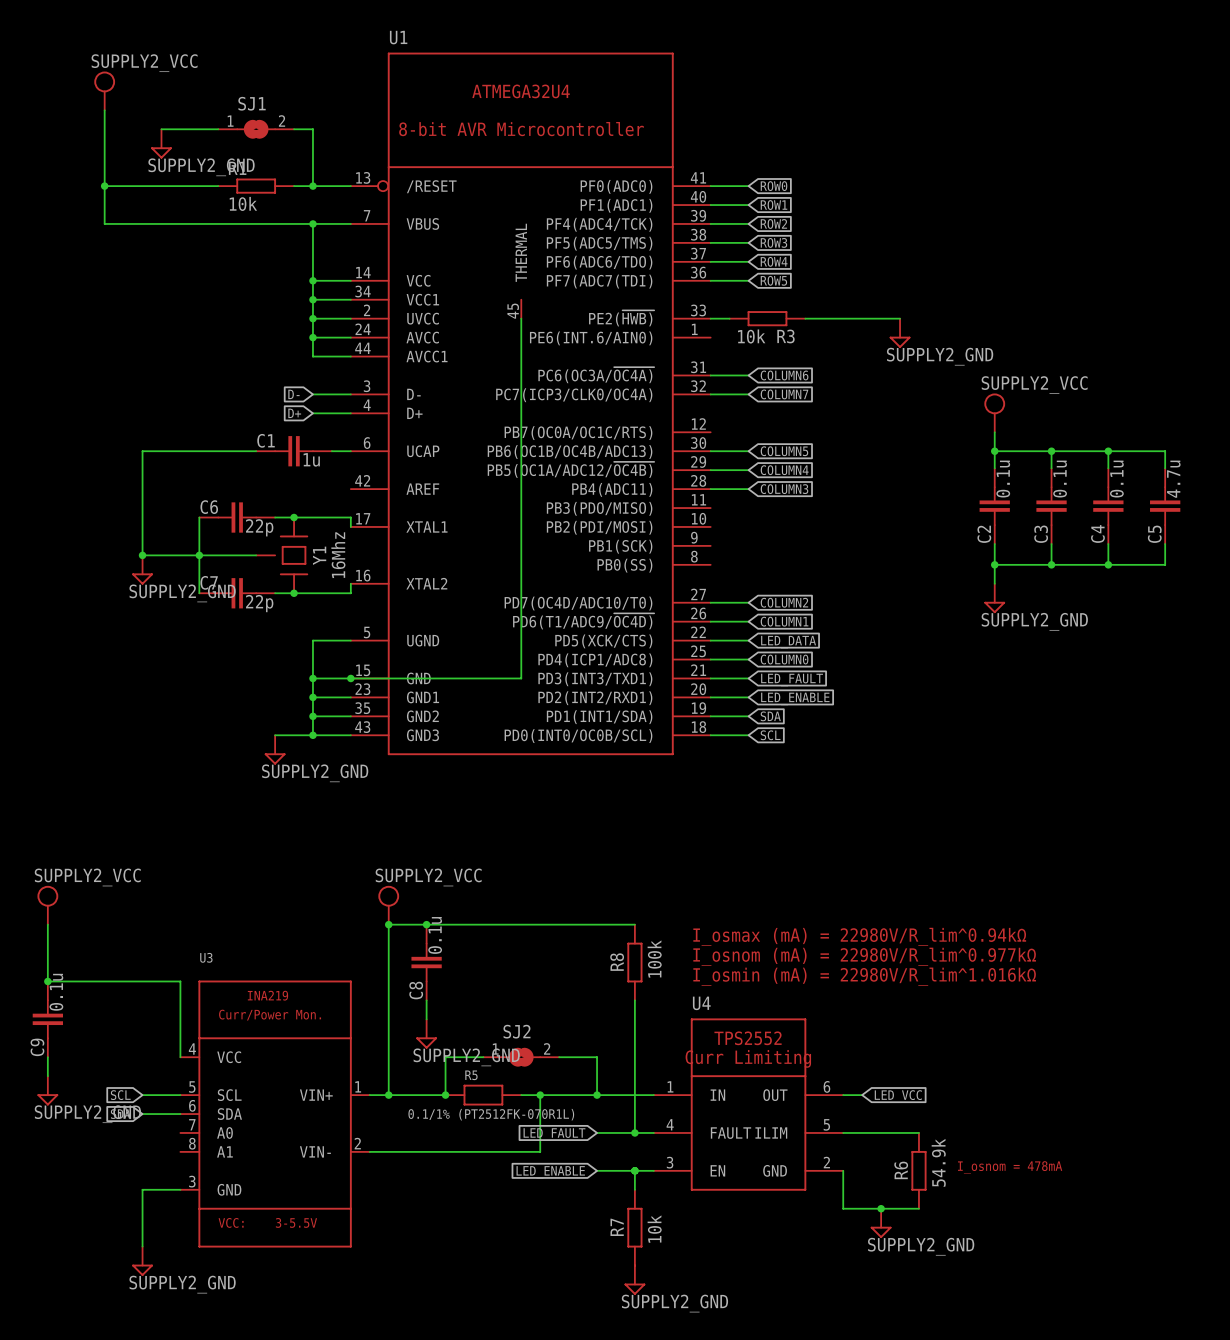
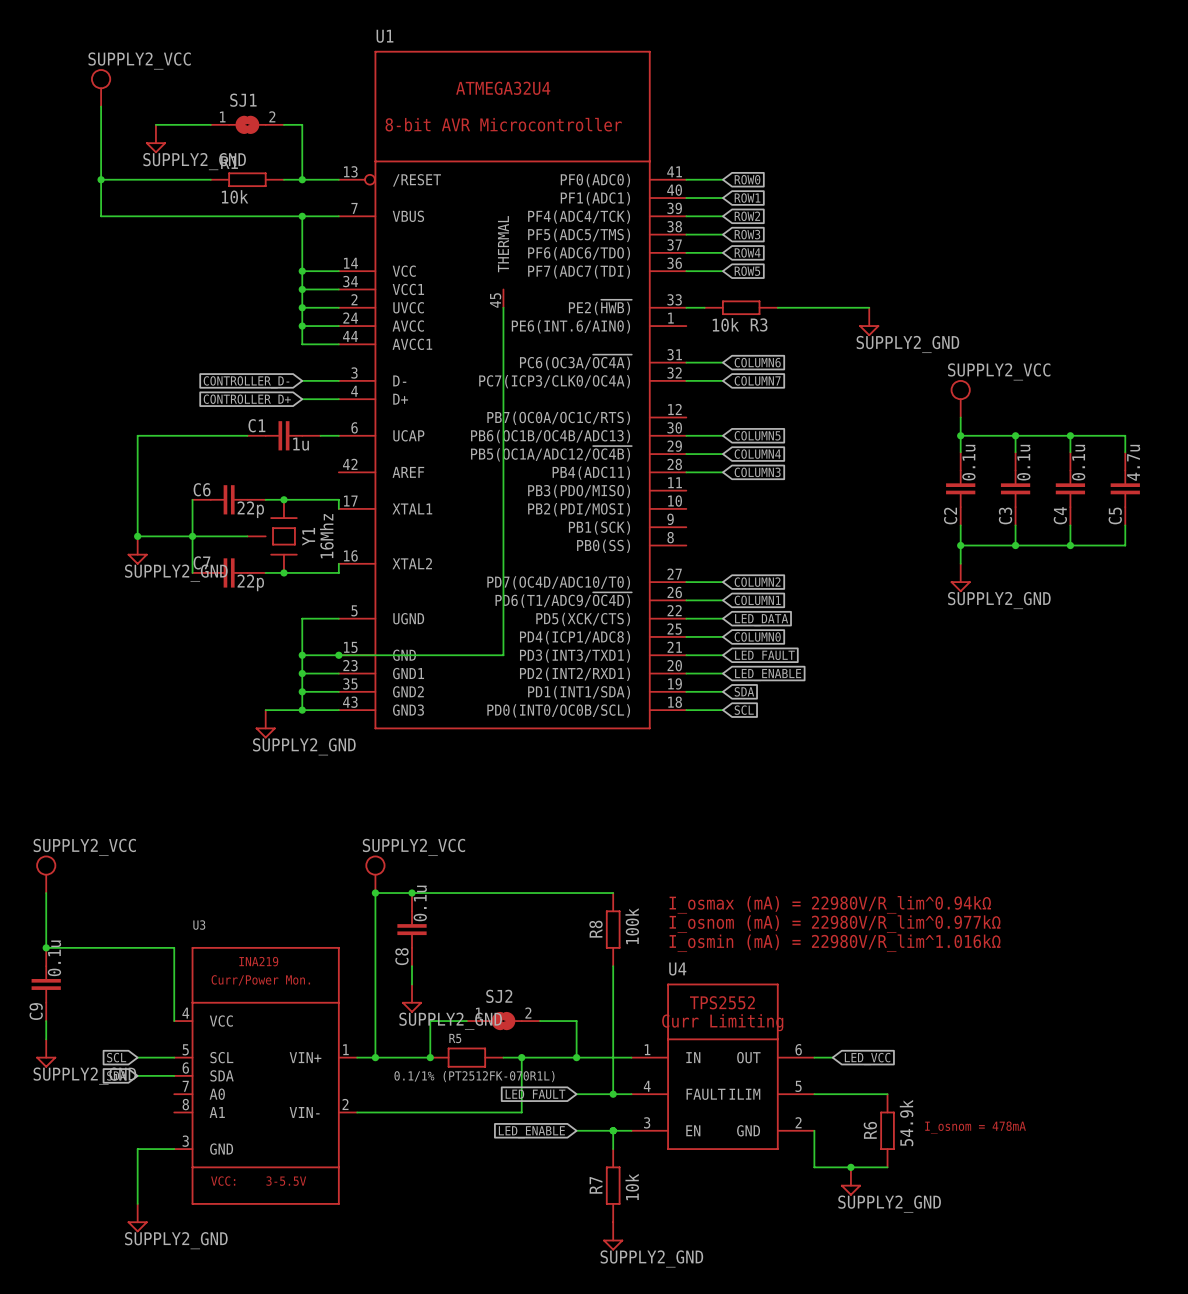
global label: D- (293, 394) -> CONTROLLER_D- (246, 382)
global label: D+ (294, 413) -> CONTROLLER_D+ (247, 400)

